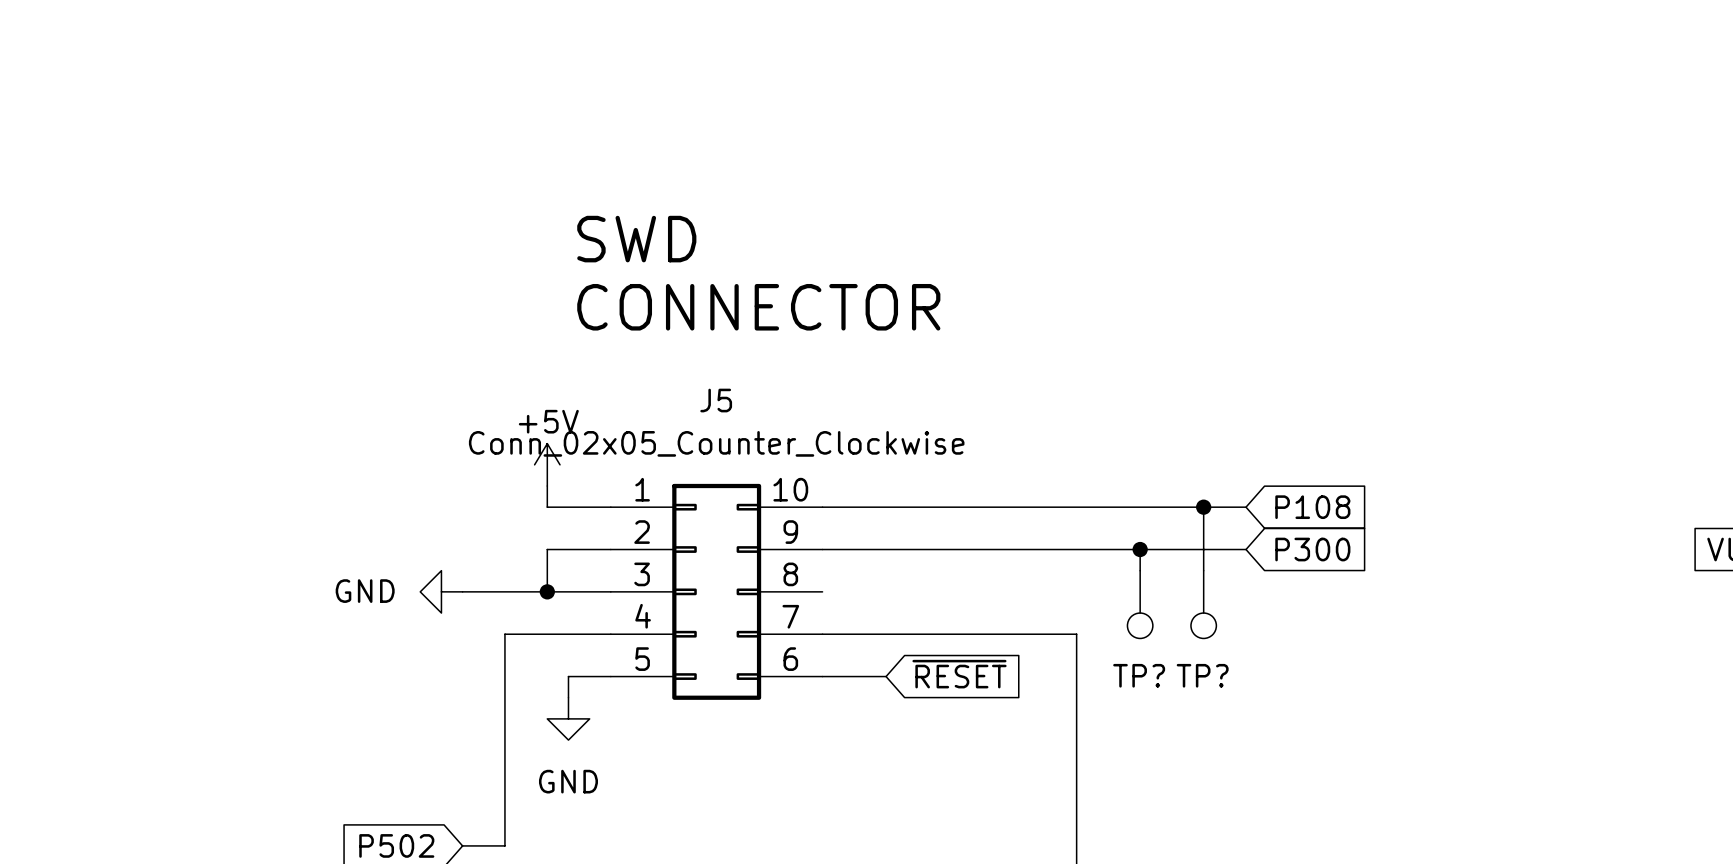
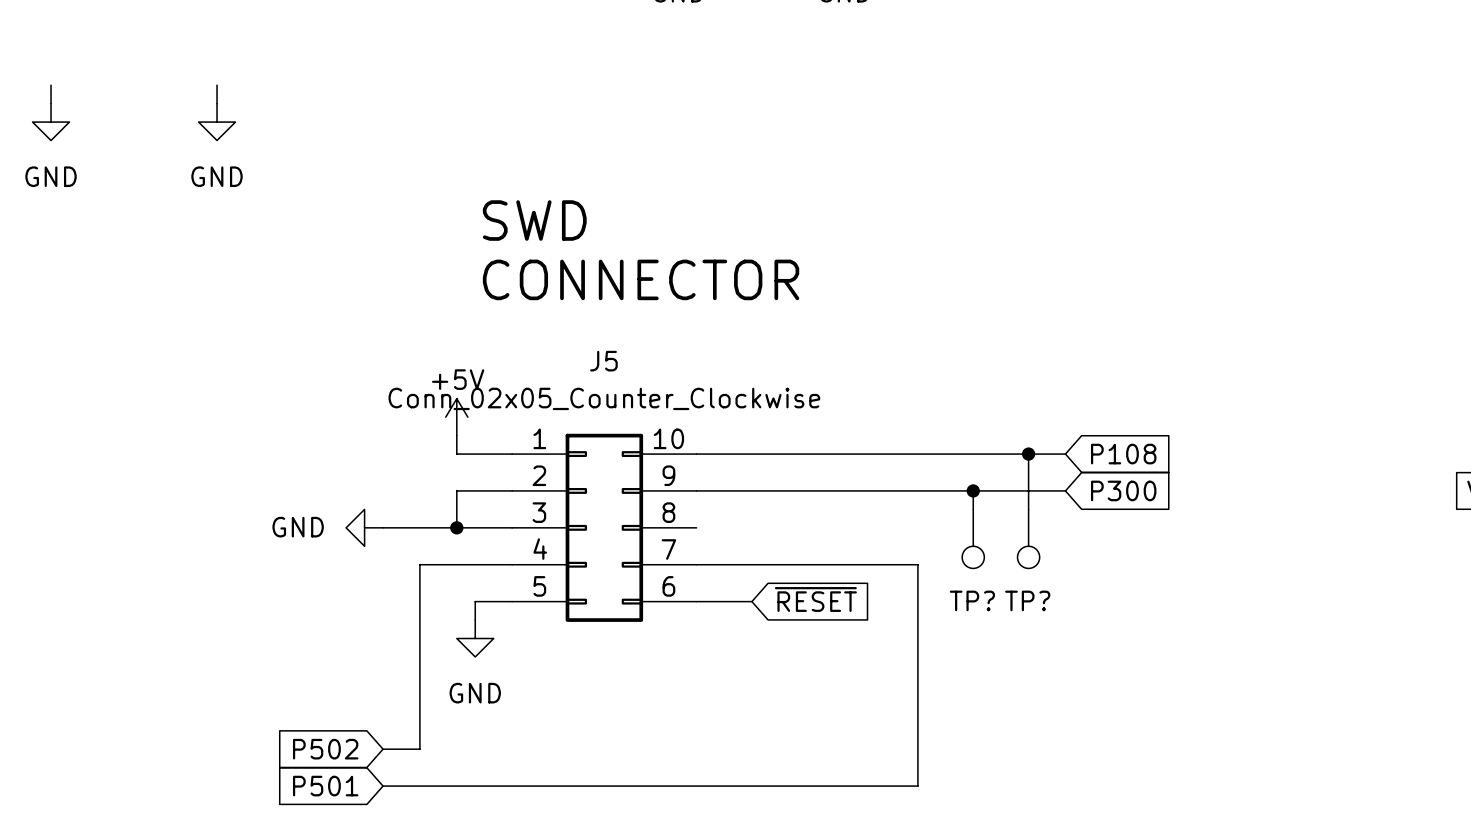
wire: none -> (51, 85) (51, 103)
wire: none -> (217, 85) (217, 103)
power symbol: none -> GND (51, 122)
power symbol: none -> GND (217, 122)

